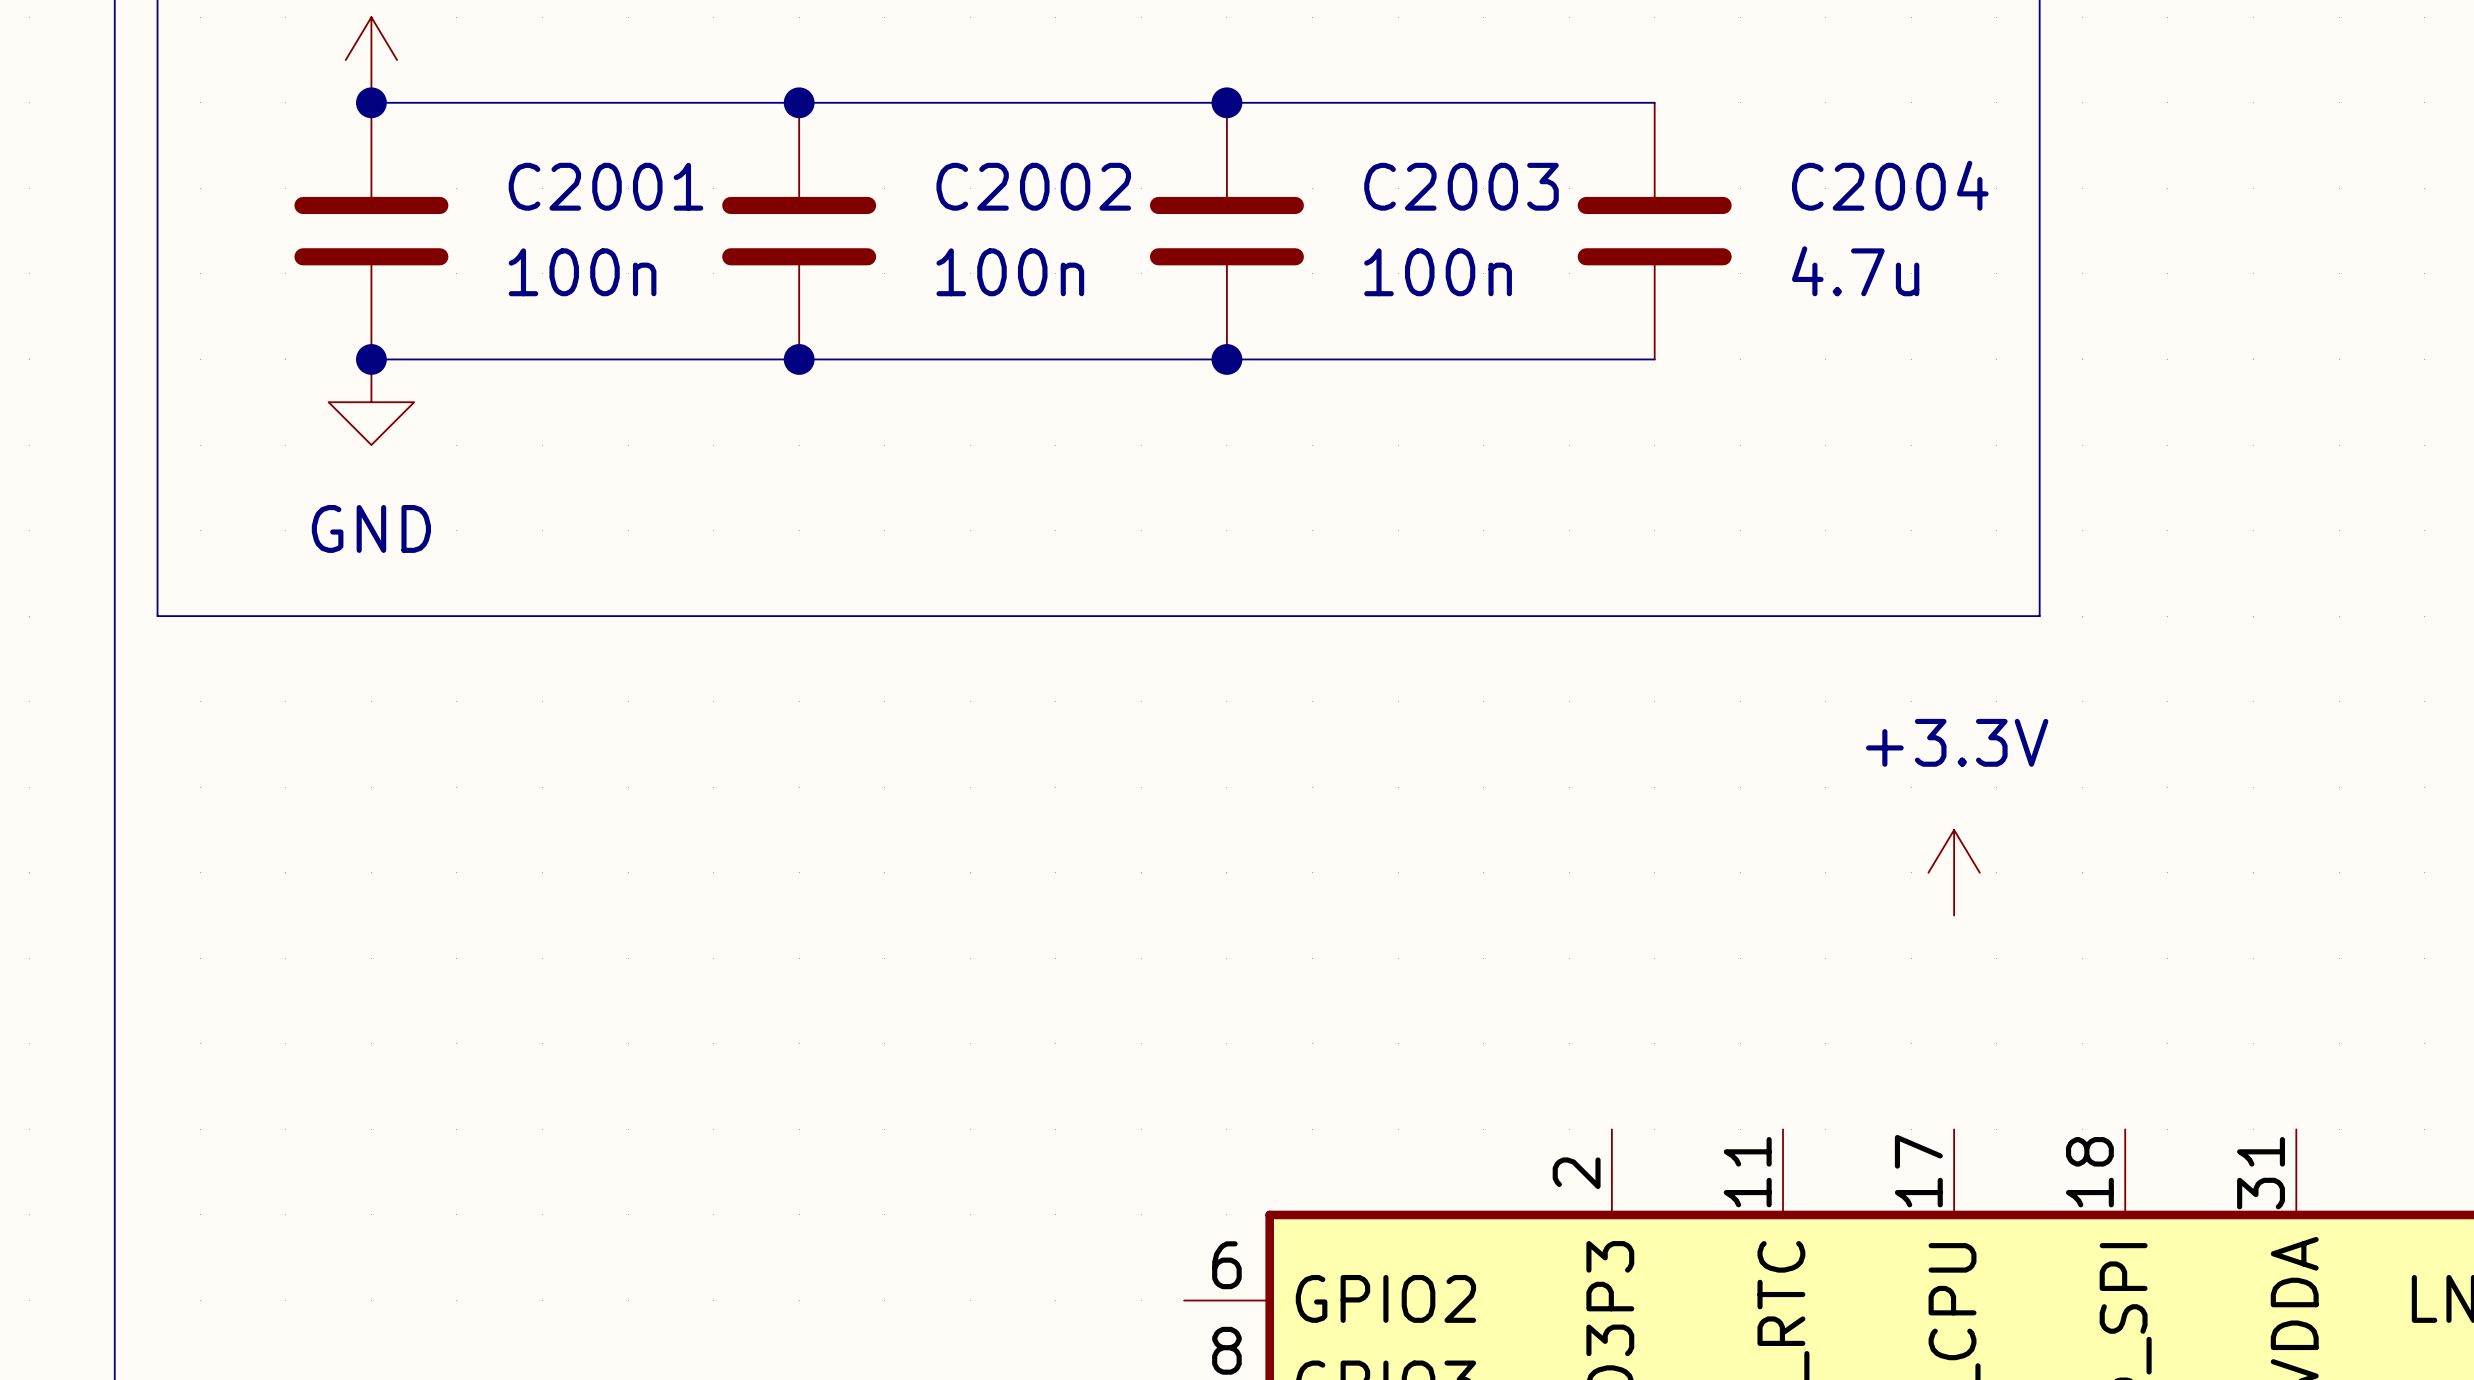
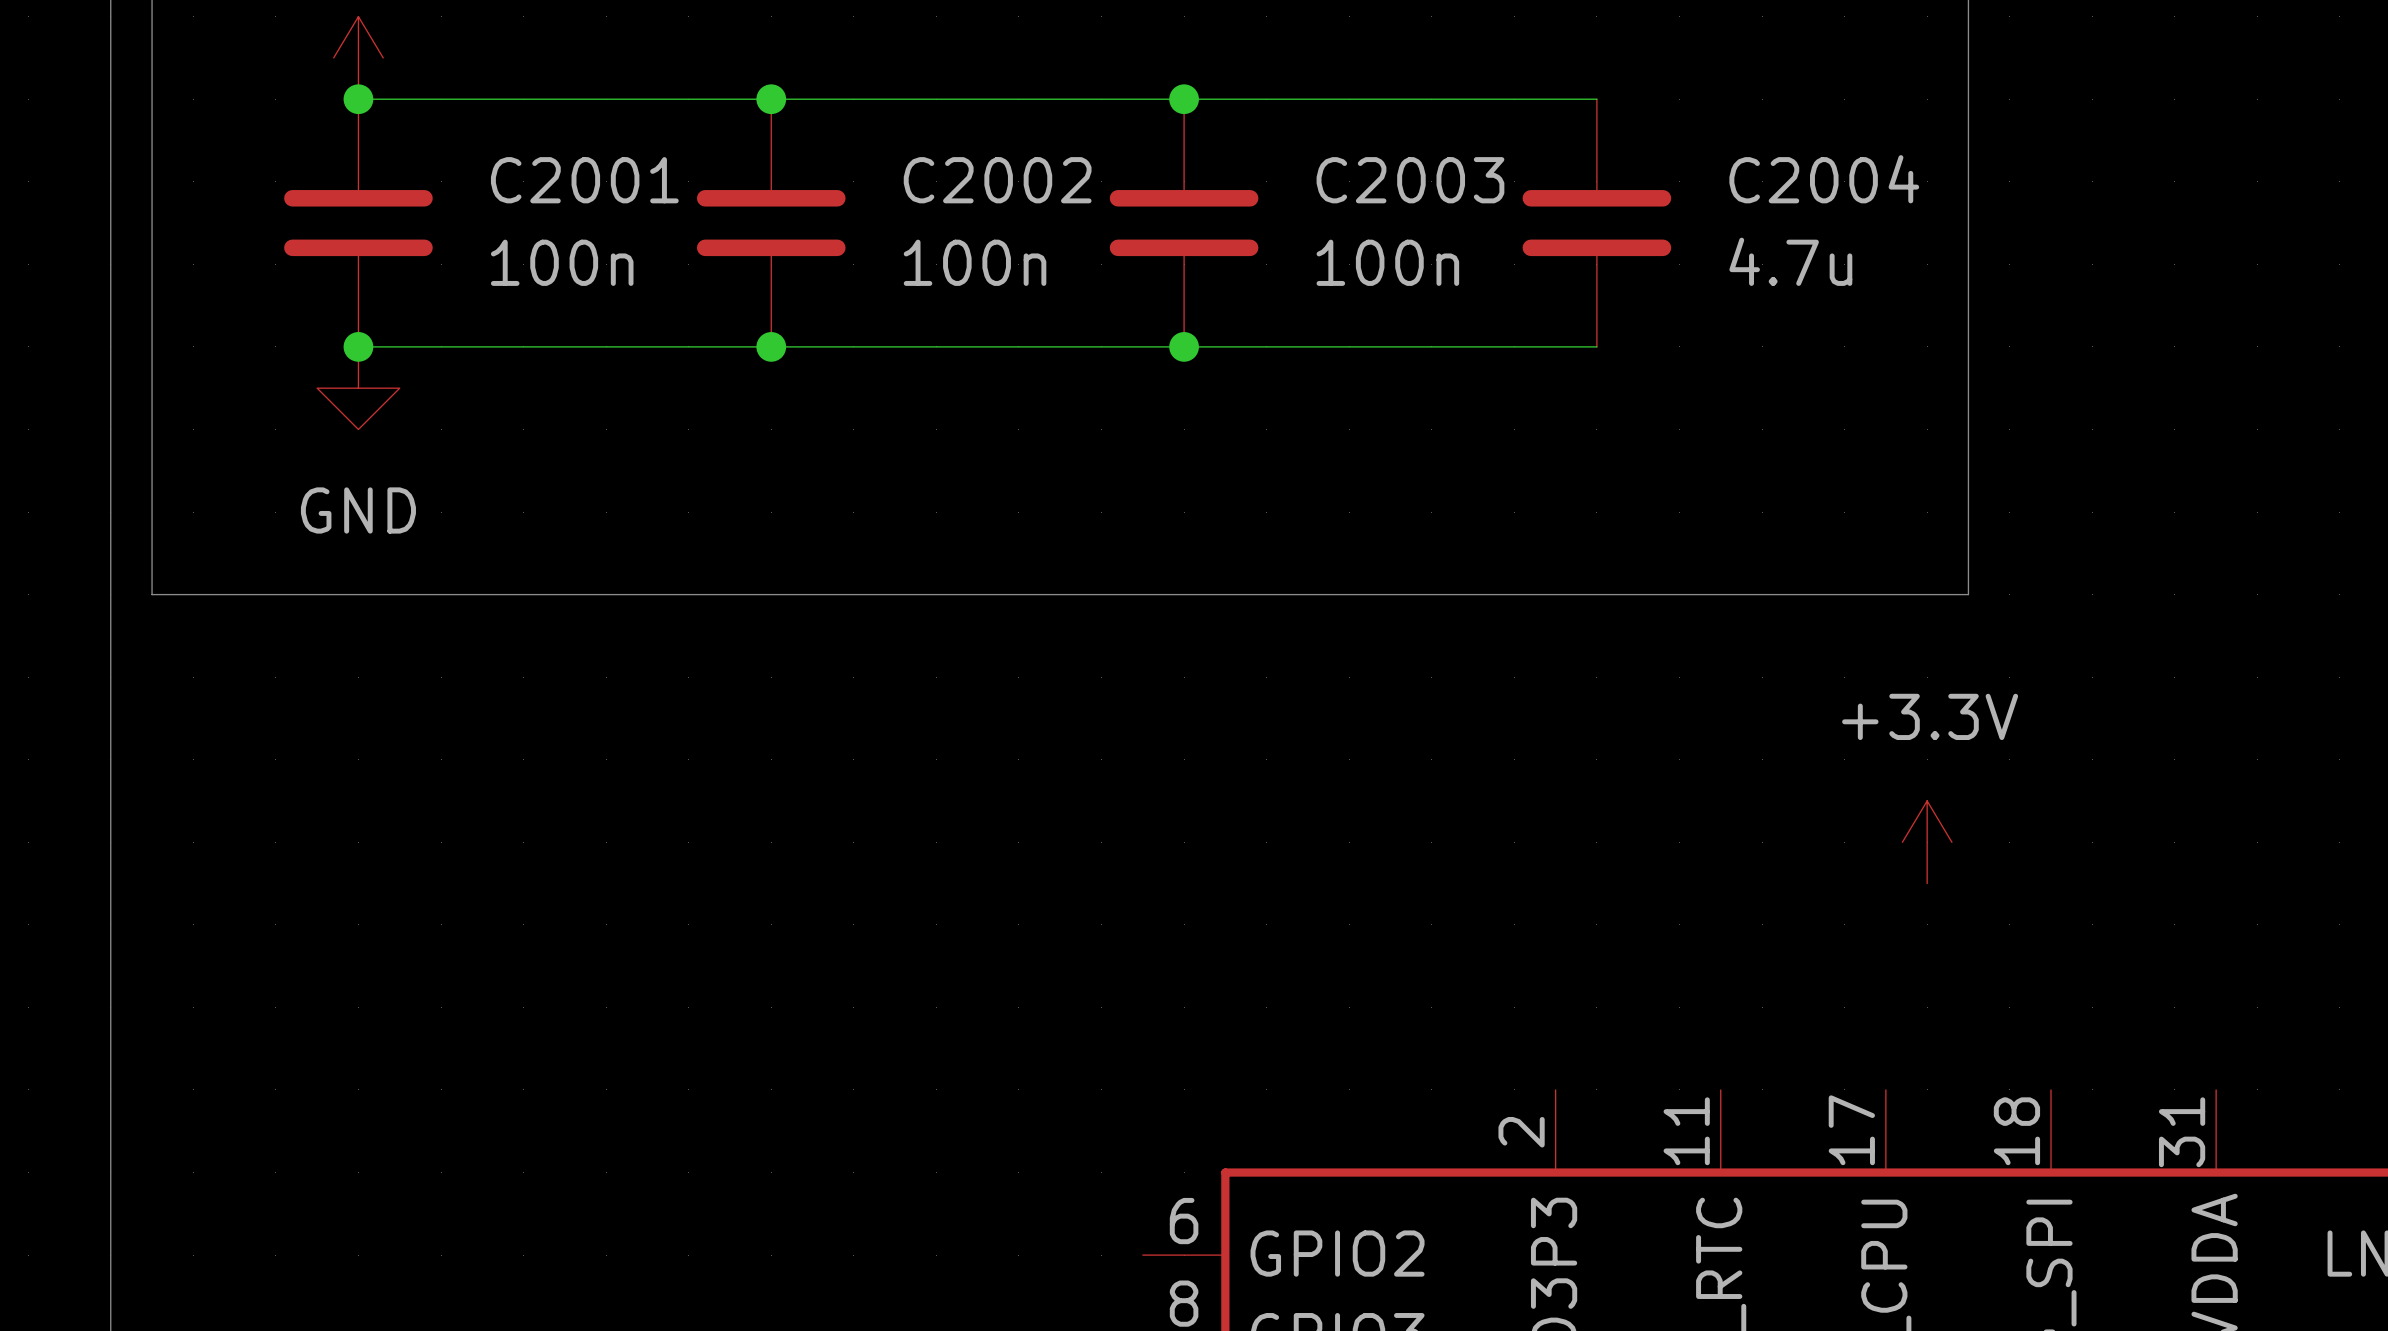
power symbol position: +3.3V (1954, 872) -> +3.3V (1927, 842)

